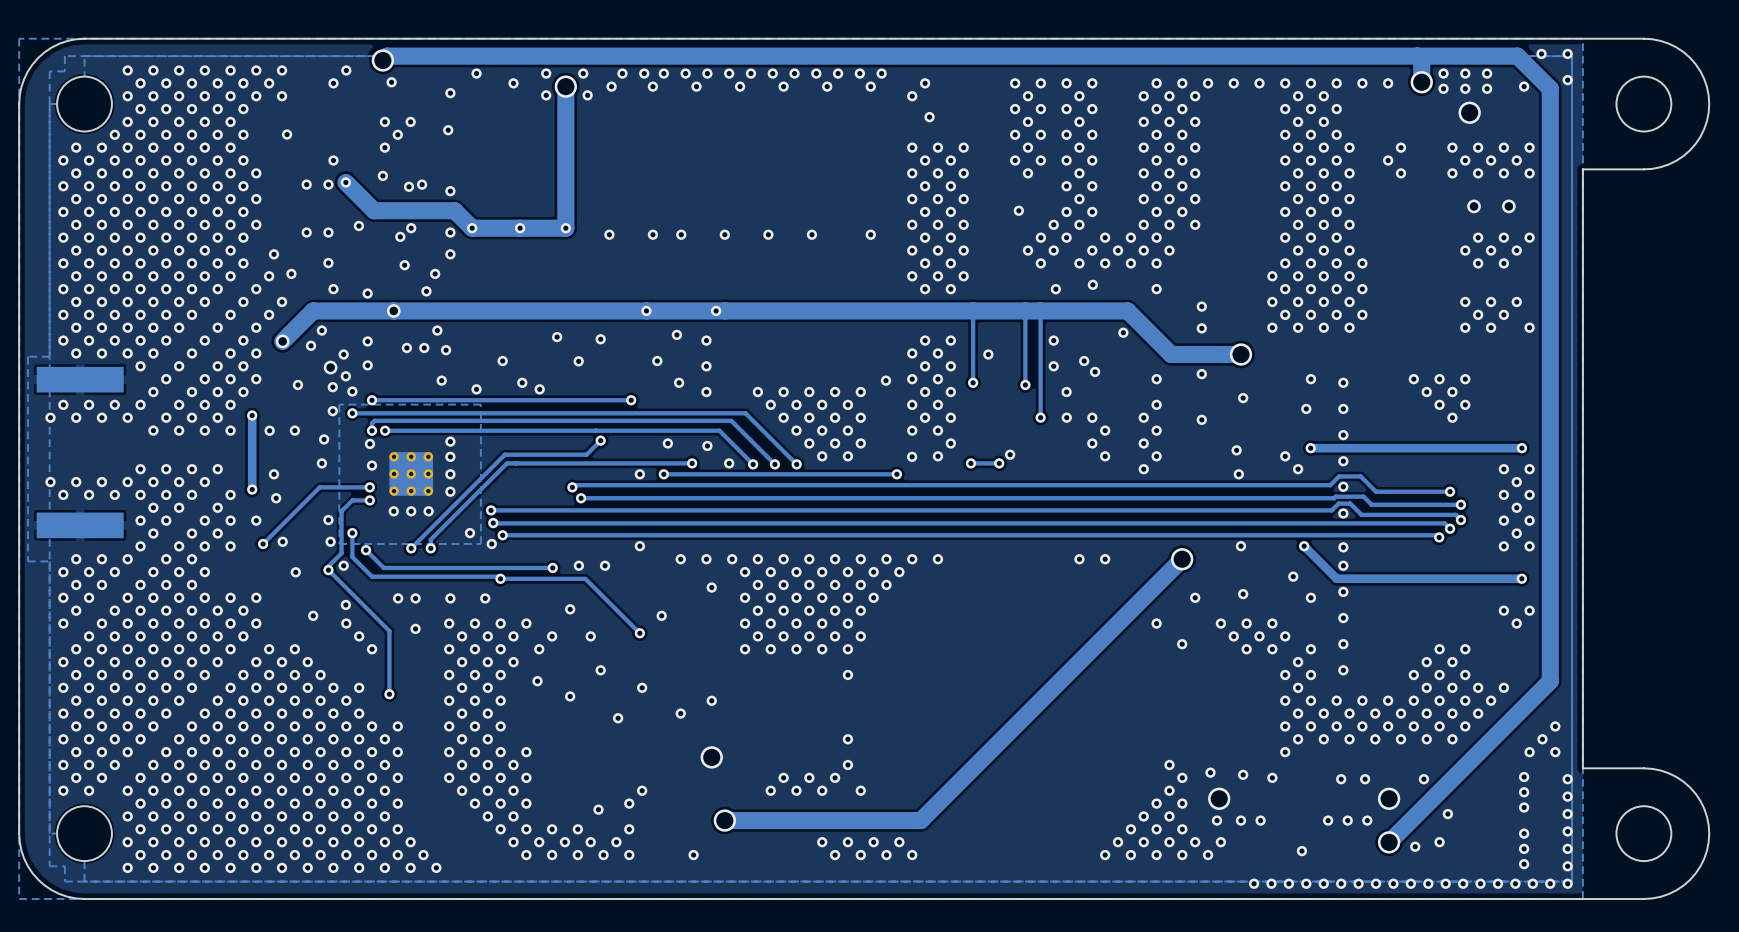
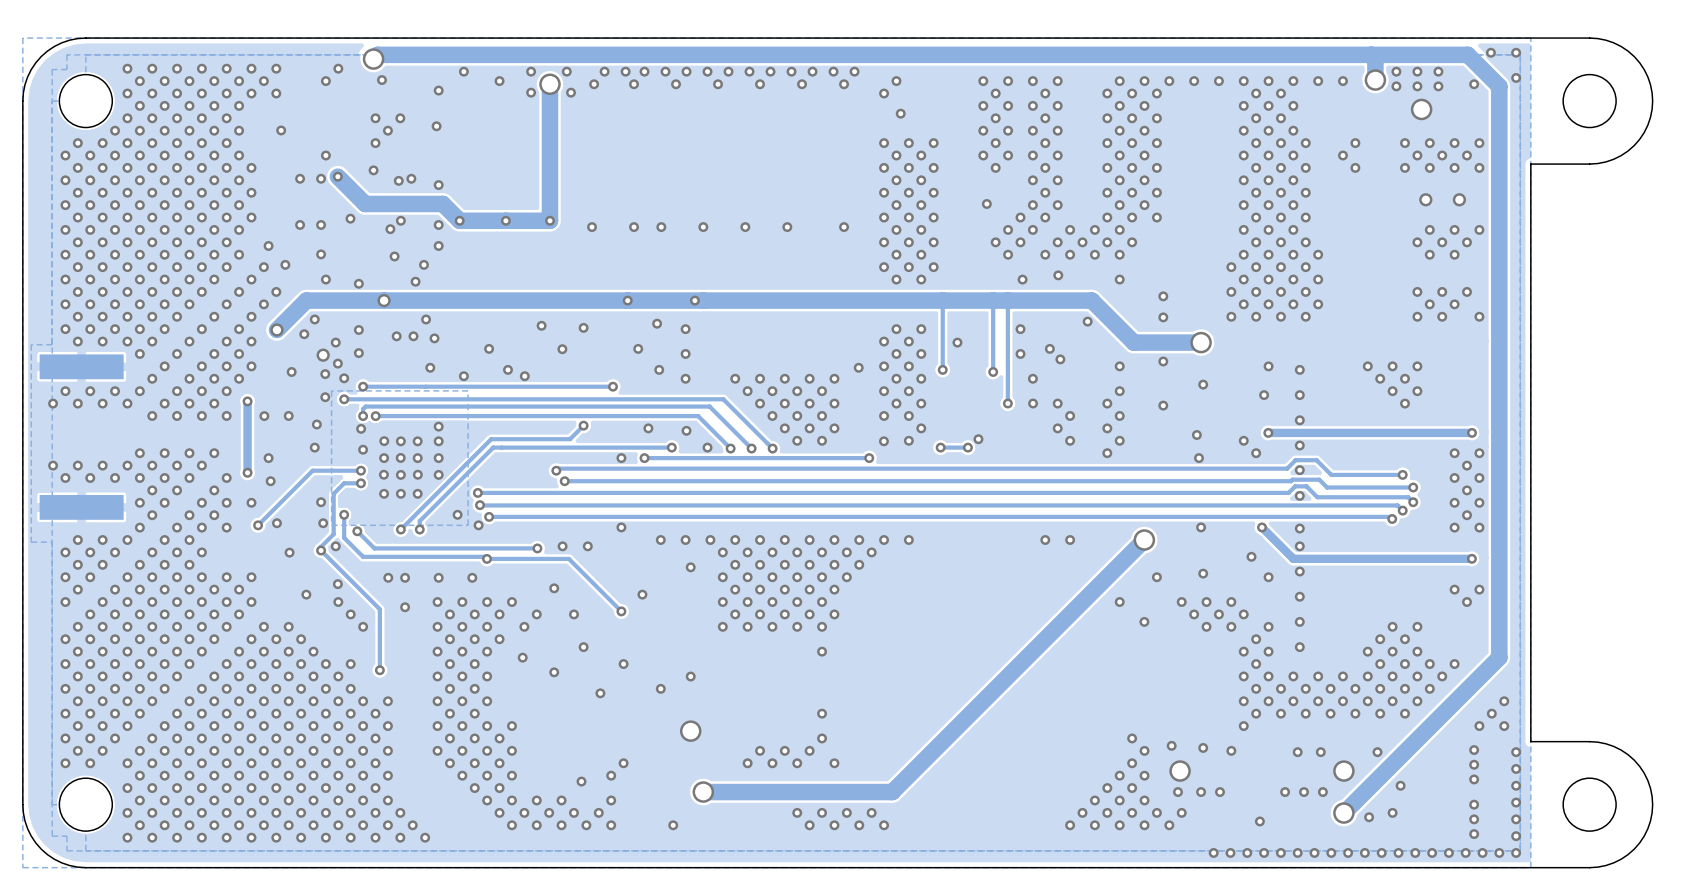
via: none -> (384, 441)
via: none -> (400, 441)
via: none -> (417, 441)
part: (411, 473) -> none
via: none -> (384, 458)
via: none -> (400, 457)
via: none -> (417, 458)
via: none -> (383, 474)
via: none -> (400, 474)
via: none -> (417, 474)

